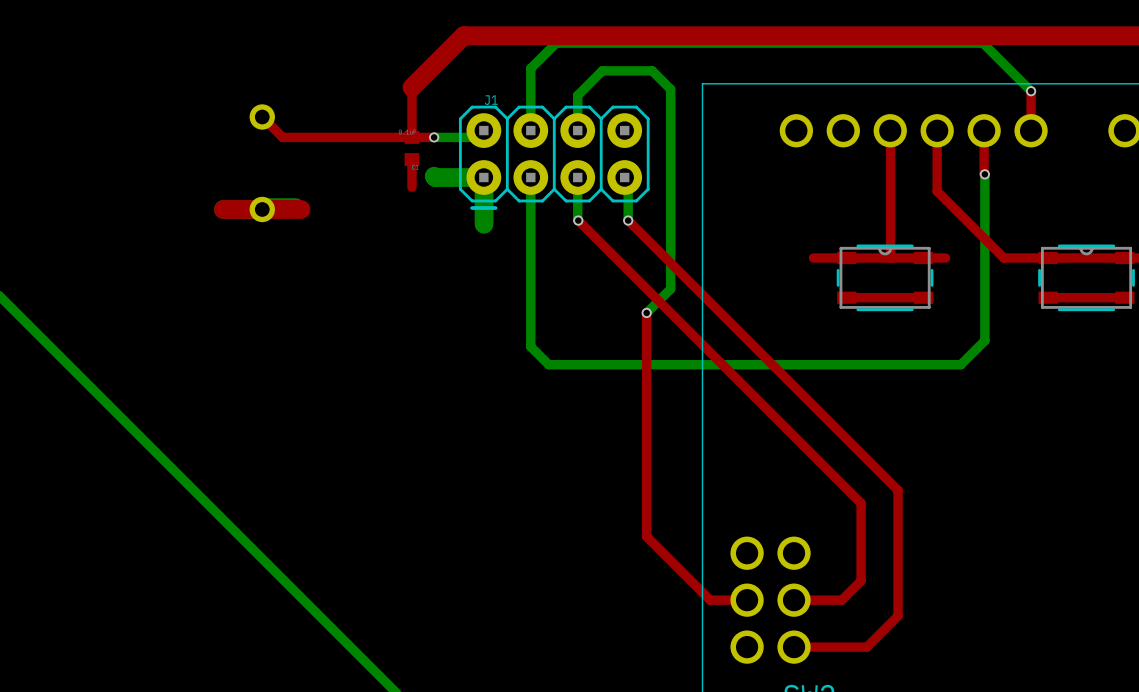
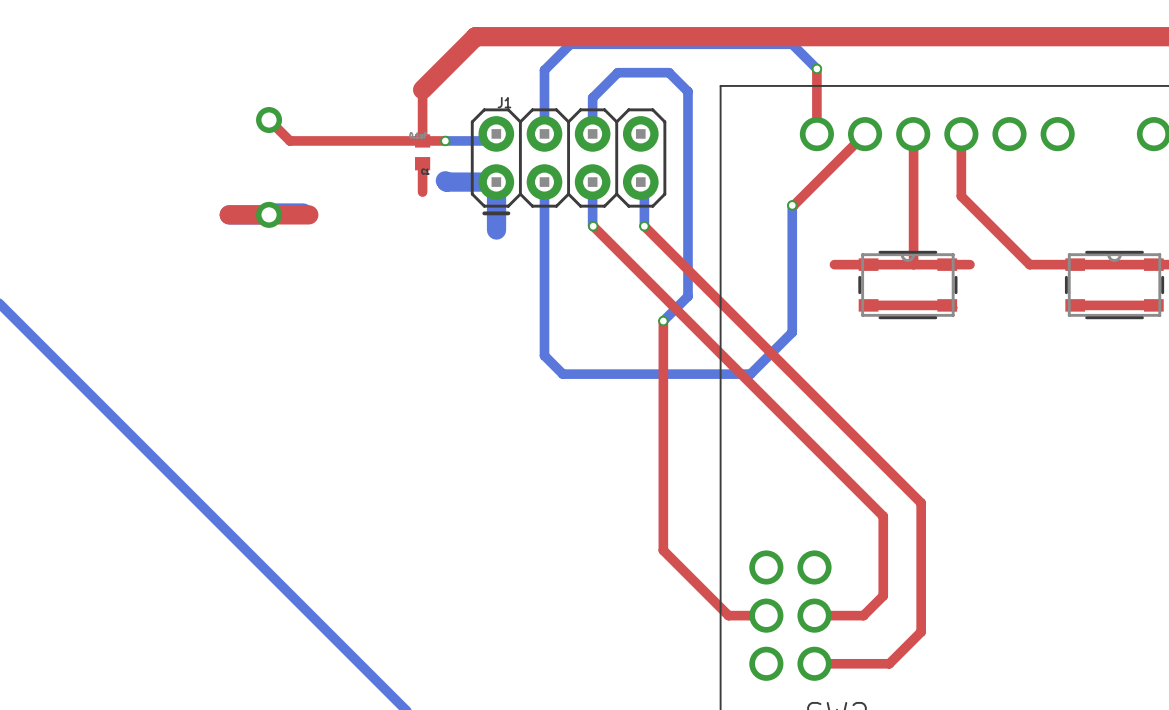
bottom track: (772, 43) (983, 43) (1031, 91) -> (792, 44) (816, 68)
top track: none -> (816, 68) (816, 134)
via: none -> (816, 68)
top track: (1031, 91) (1031, 130) -> none
via: (1031, 91) -> none
top track: none -> (865, 134) (792, 205)
top track: (984, 130) (984, 174) -> none
bottom track: (984, 174) (984, 340) (960, 364) (731, 364) -> (792, 205) (792, 332) (750, 374)
via: (984, 174) -> none
via: none -> (792, 205)

